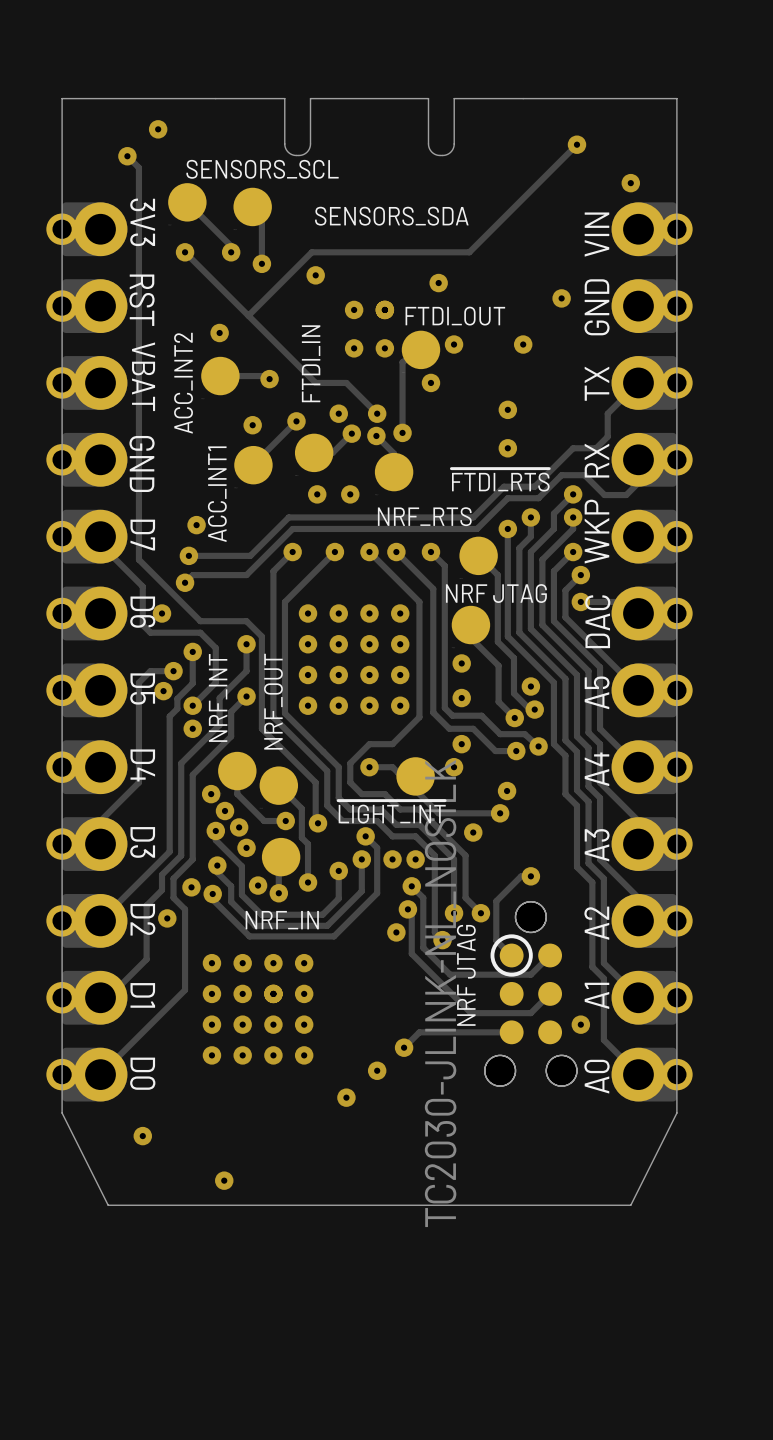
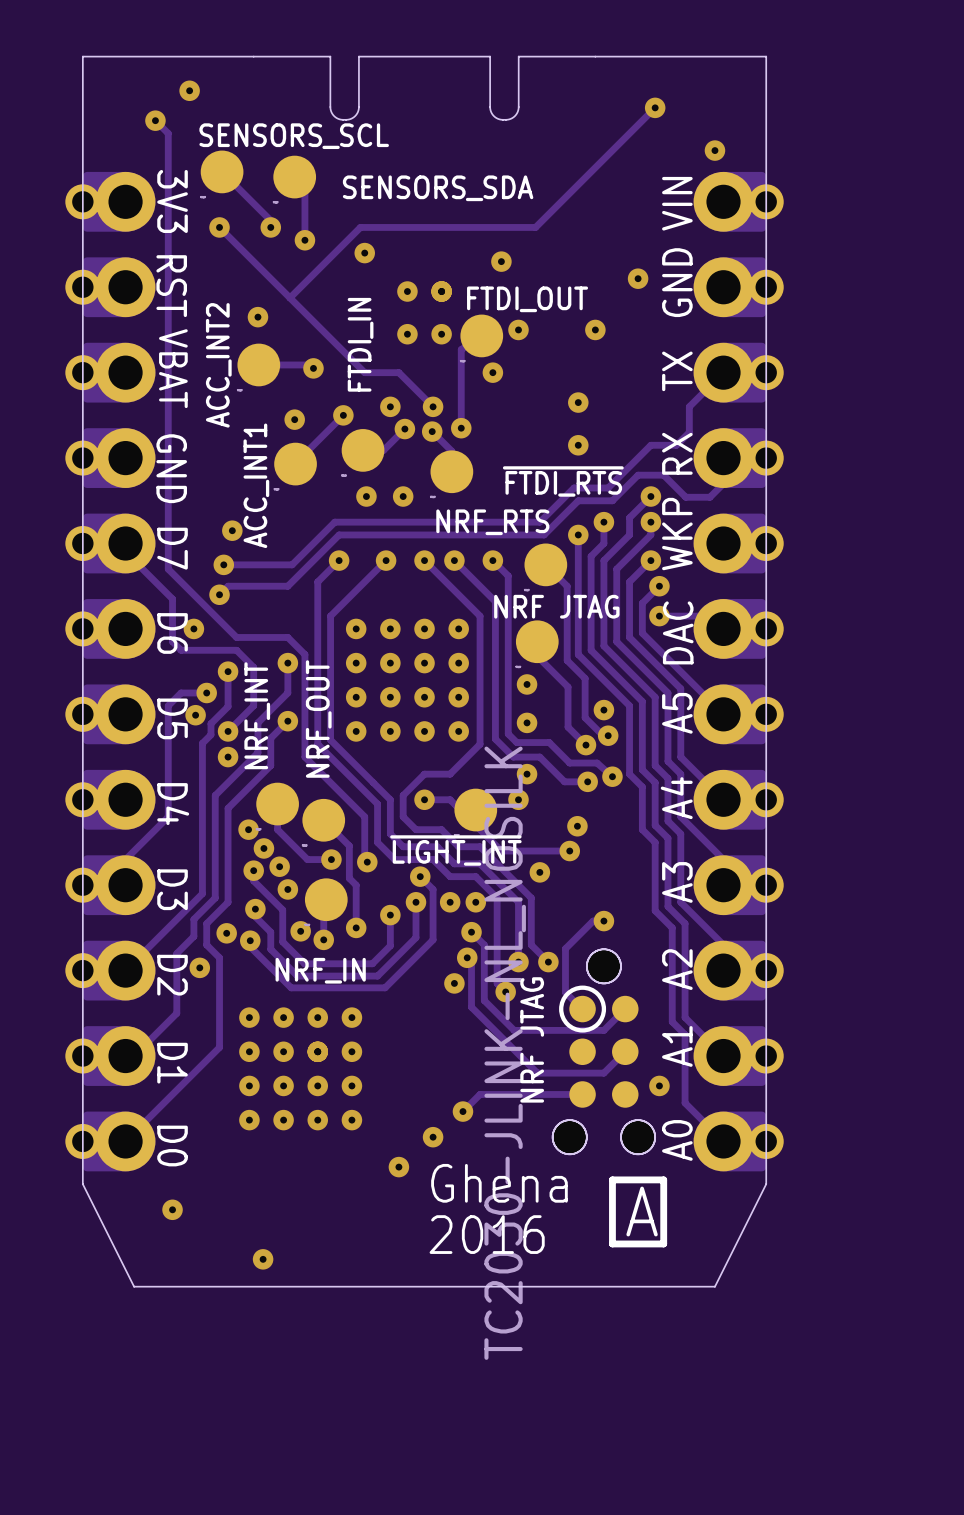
line: none -> (663, 1179) (612, 1179) (612, 1243) (663, 1243) (663, 1179)
text: none -> Ghena (499, 1183)
text: none -> A (642, 1211)
text: none -> 2016 (487, 1234)

